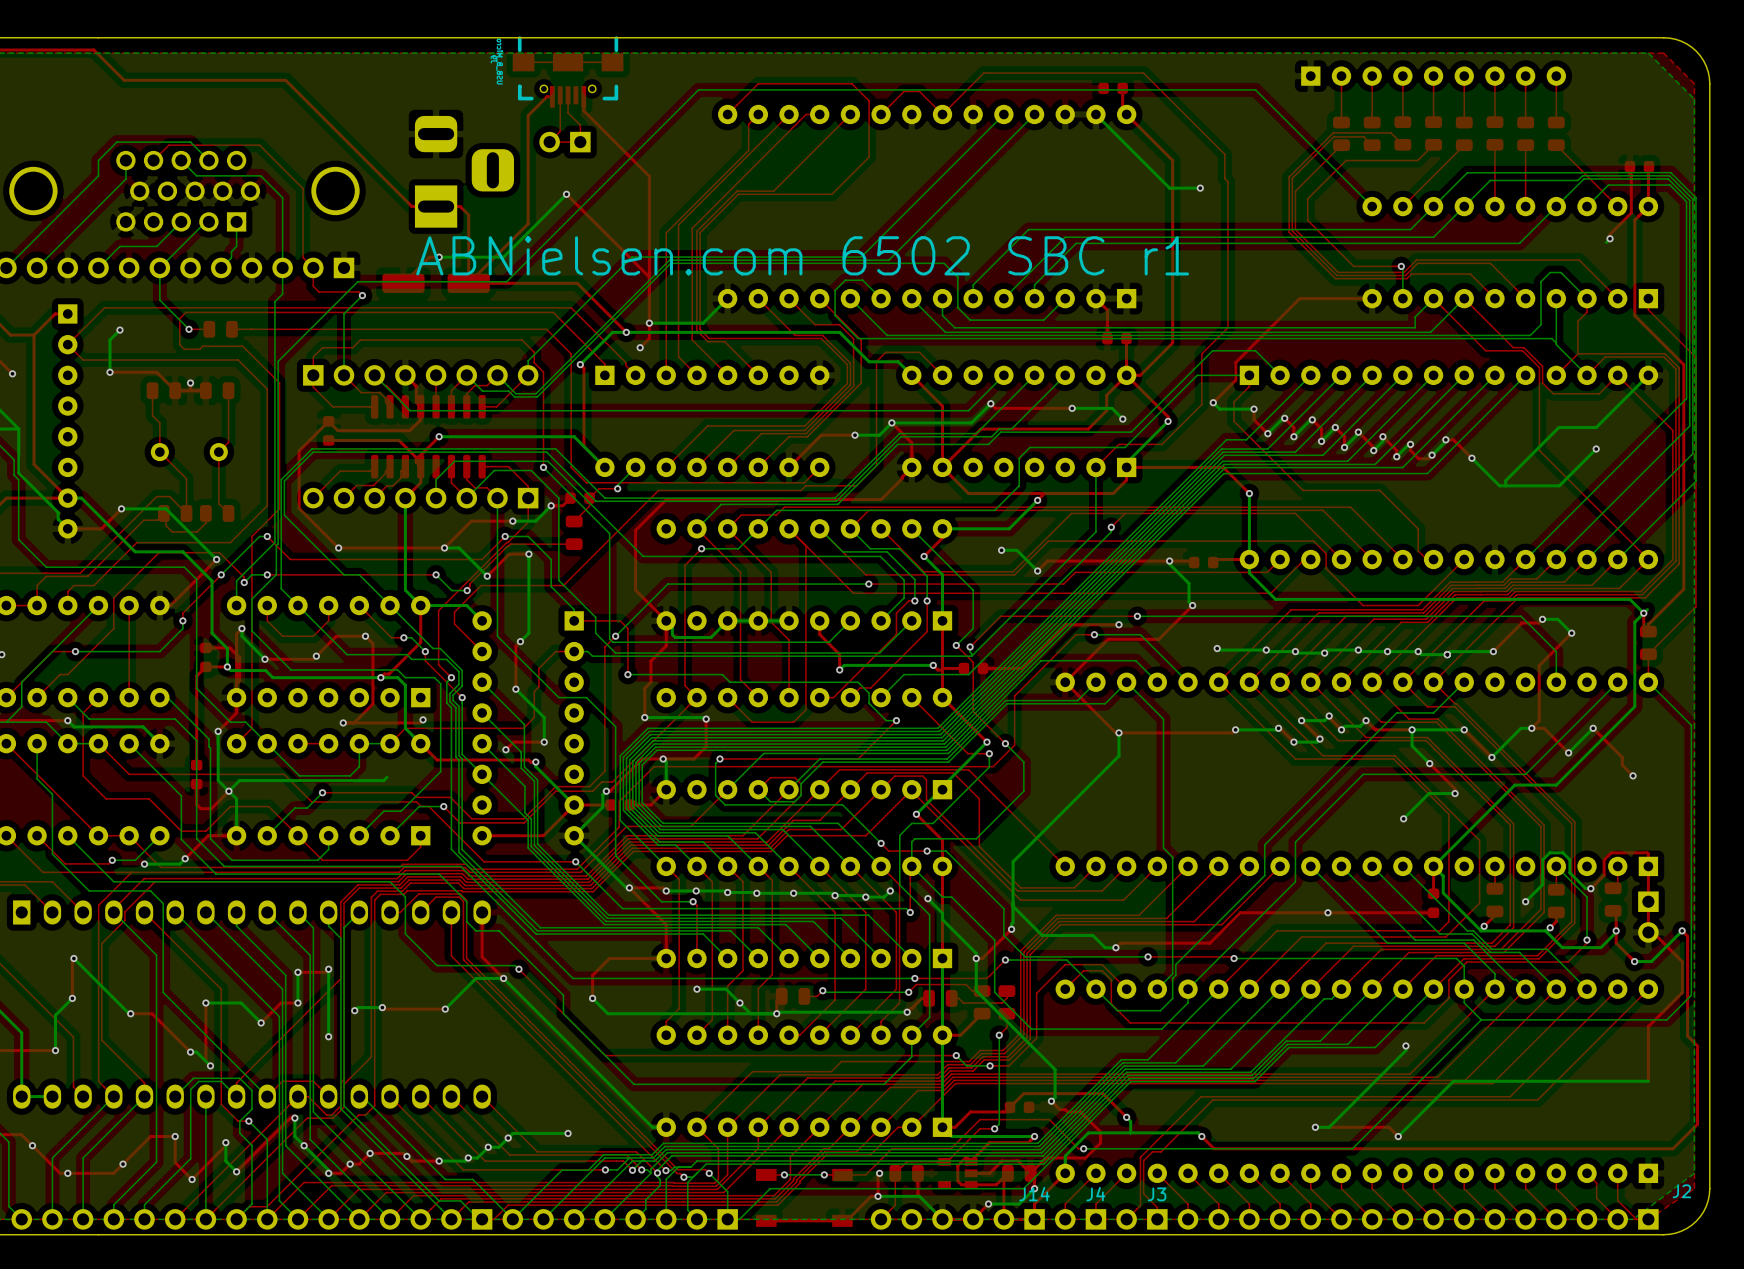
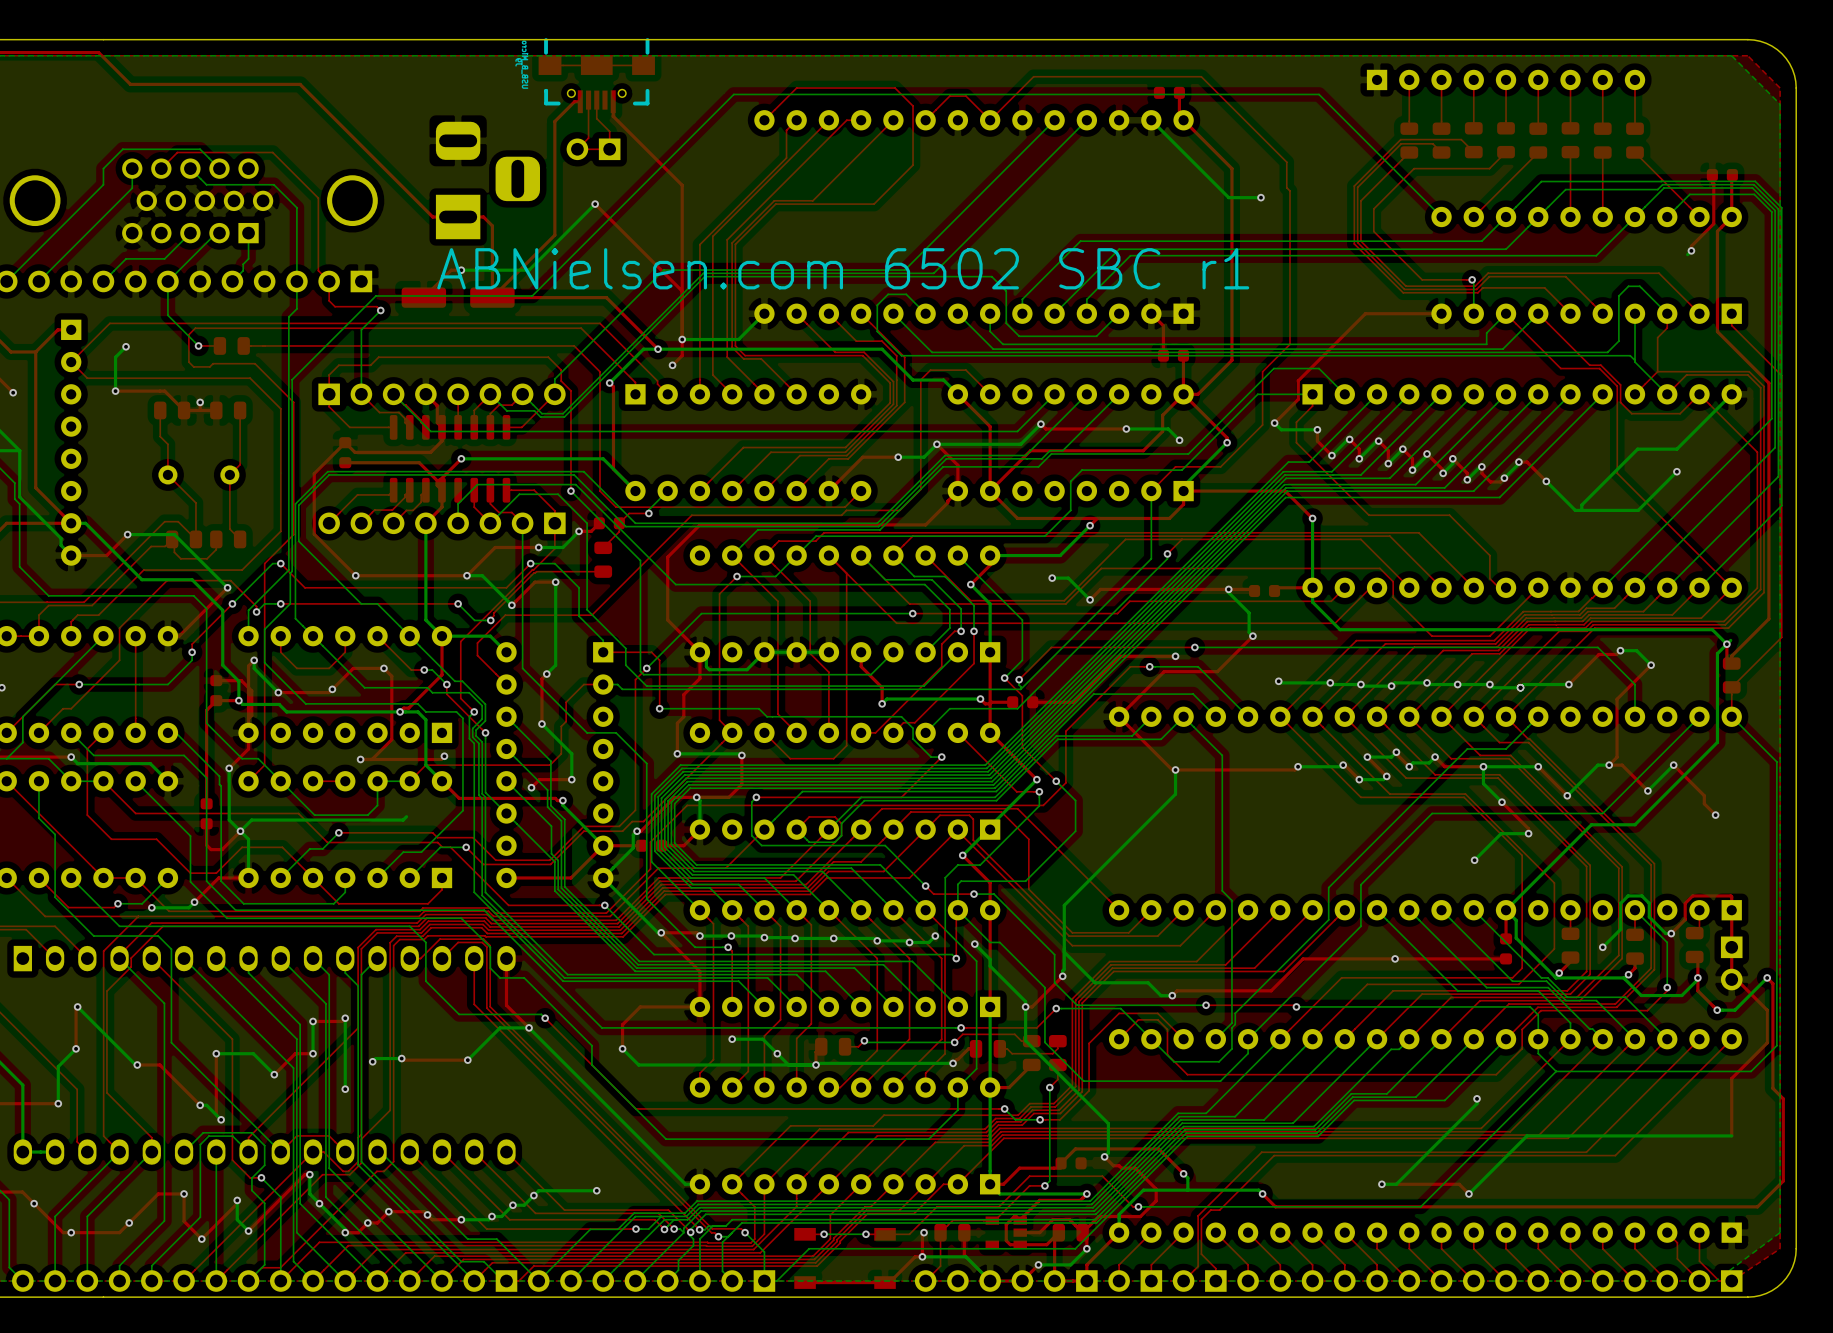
J2 name: J2 (1681, 1191) -> none
J14 name: J14 (1034, 1194) -> none
J4 name: J4 (1095, 1194) -> none
J3 name: J3 (1157, 1194) -> none

